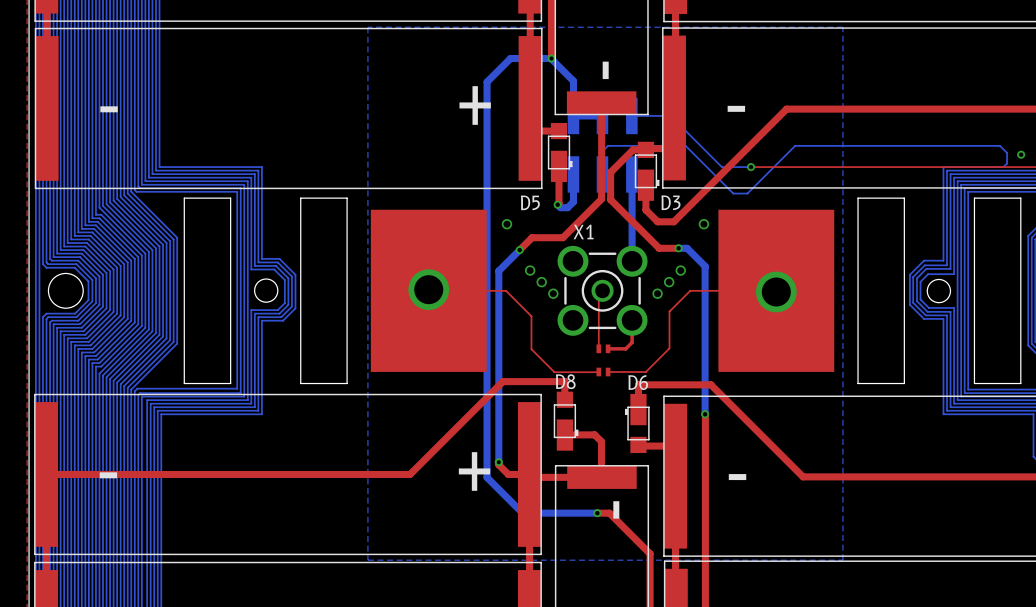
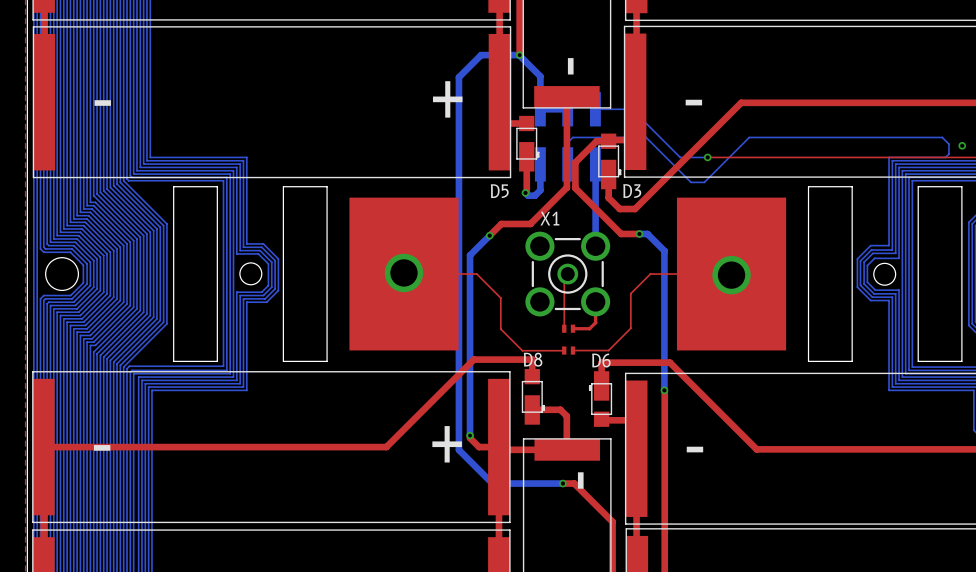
bottom zone outline: (367, 27) (367, 560) (842, 560) (842, 27) (367, 27) -> none
via: (506, 224) -> none
via: (703, 224) -> none
via: (530, 270) -> none
via: (680, 270) -> none
via: (541, 282) -> none
via: (669, 282) -> none
via: (553, 293) -> none
via: (657, 293) -> none

